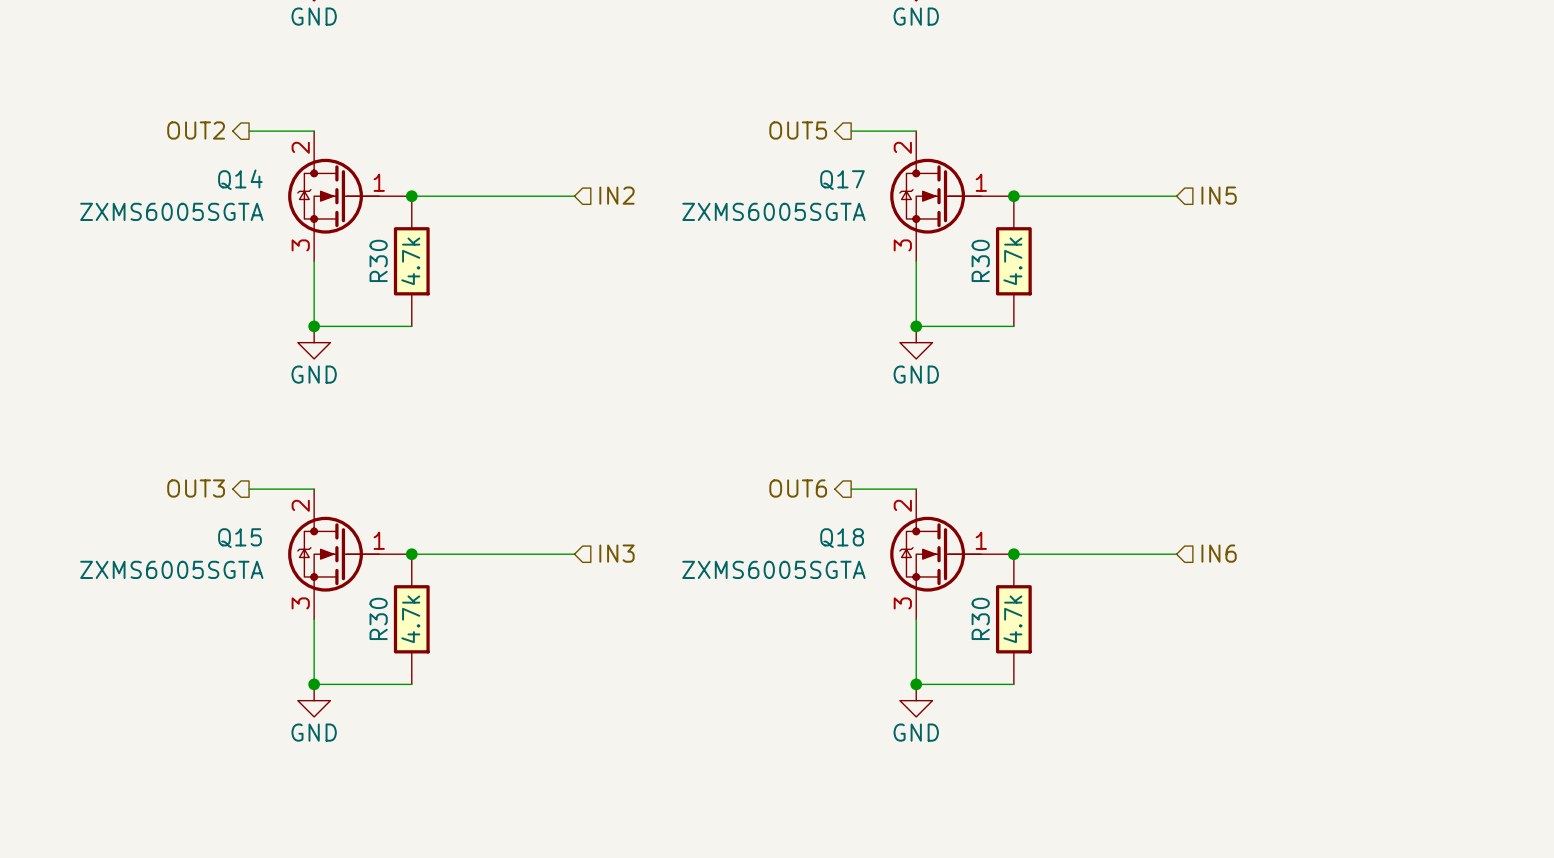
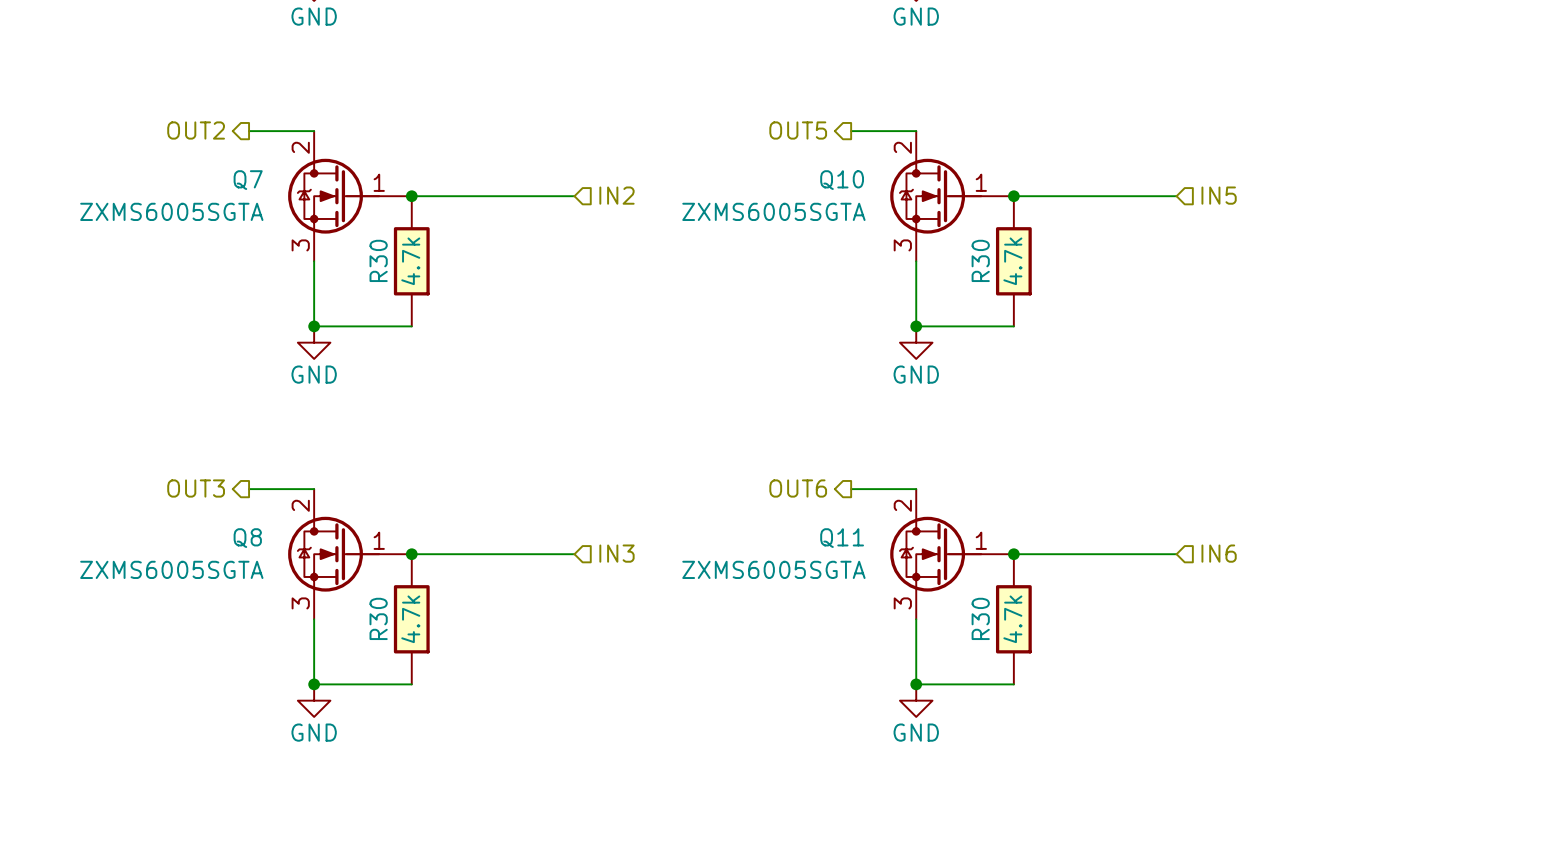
Q14 name: Q14 (240, 179) -> Q7 (248, 180)
Q17 name: Q17 (842, 180) -> Q10 (842, 180)
Q15 name: Q15 (240, 538) -> Q8 (247, 538)
Q18 name: Q18 (842, 538) -> Q11 (842, 538)

